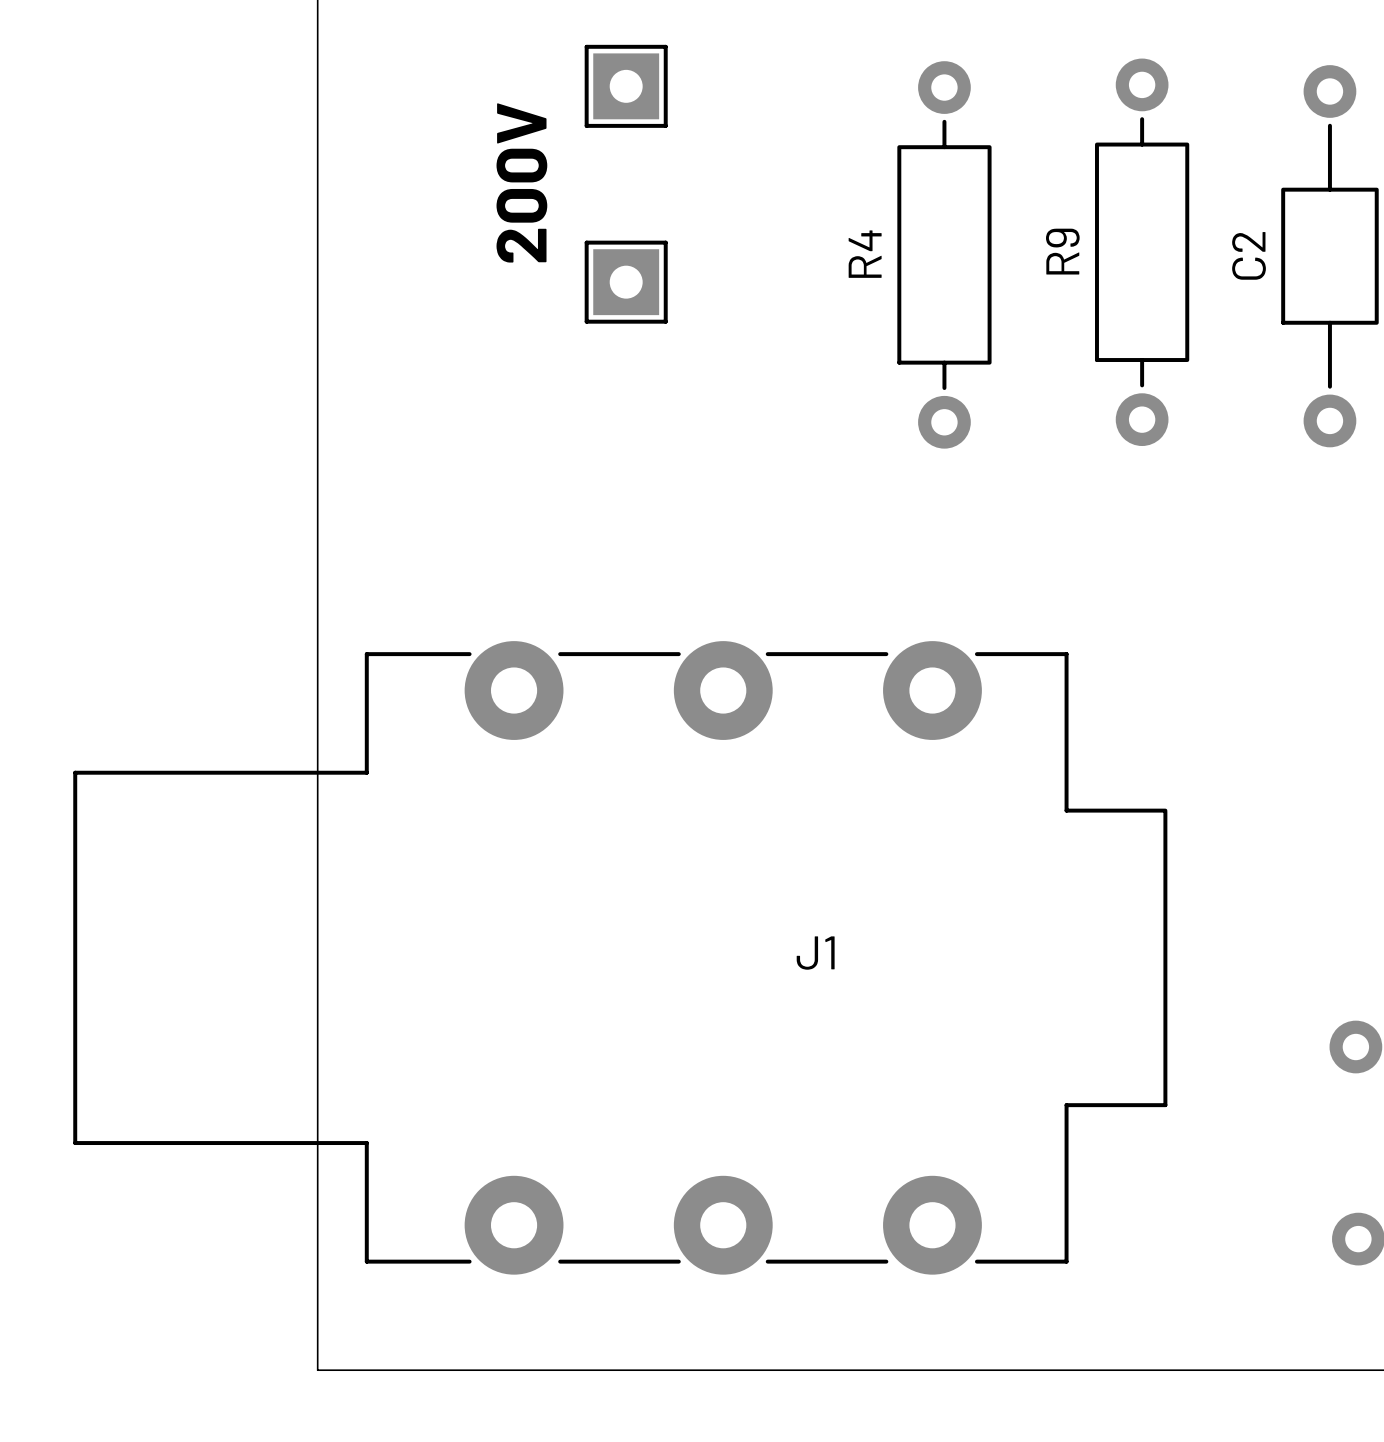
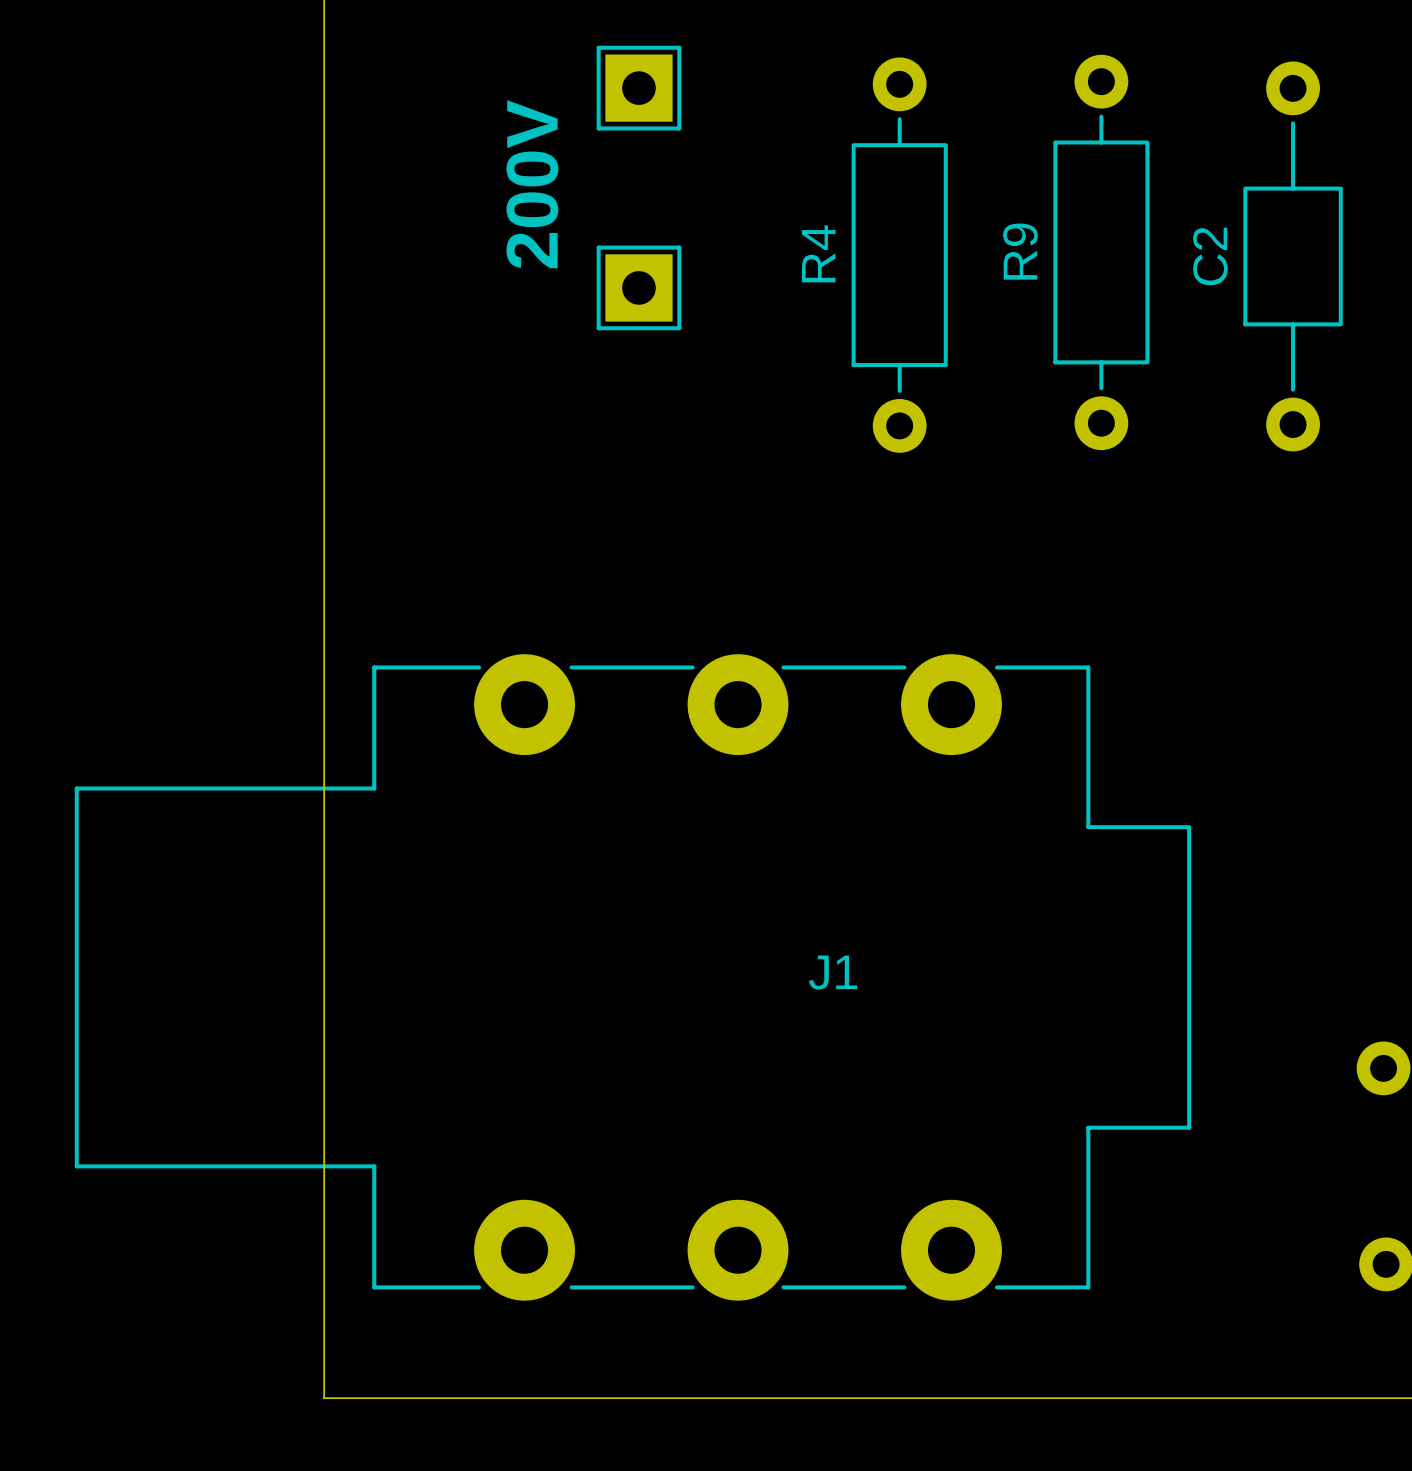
R9 position: (1142, 252) -> (1101, 252)
R4 position: (944, 254) -> (899, 255)
C2 position: (1329, 256) -> (1293, 256)

